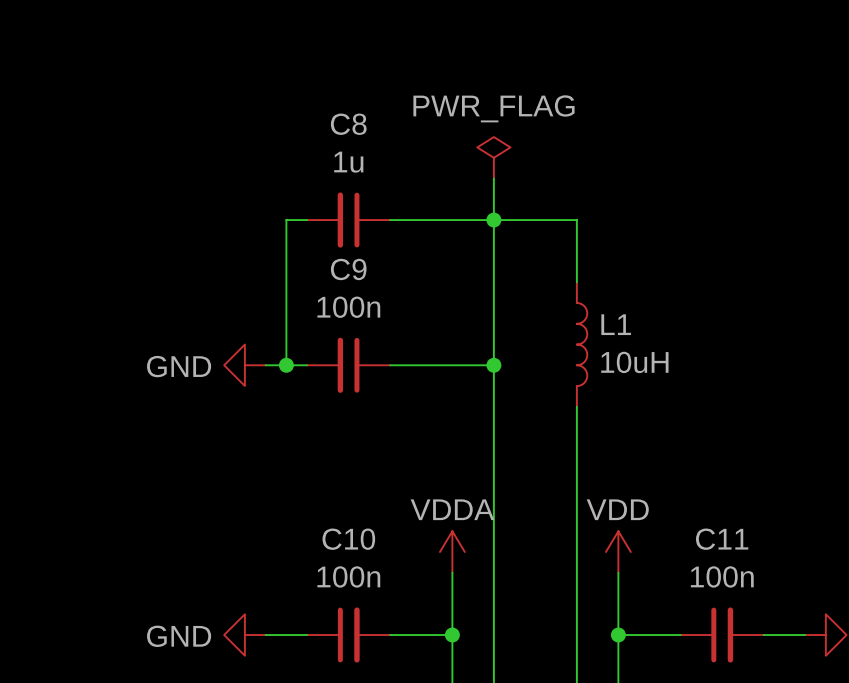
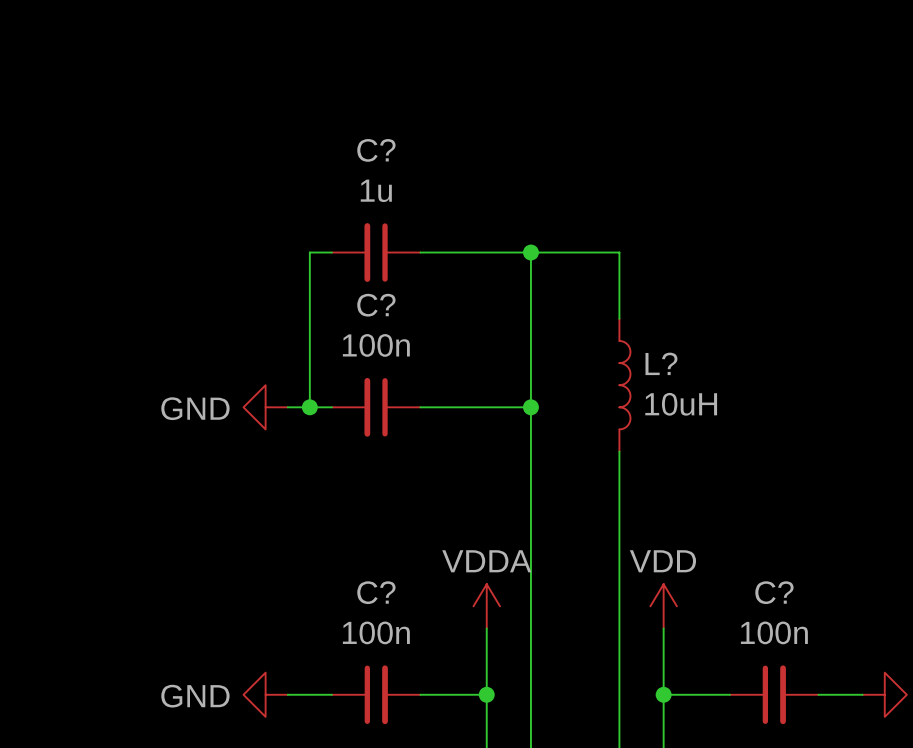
C8 name: C8 (348, 124) -> C? (376, 150)
power symbol: PWR_FLAG (493, 157) -> none
wire: (493, 178) (493, 220) -> none
C9 name: C9 (348, 269) -> C? (376, 305)
L1 name: L1 (616, 324) -> L? (661, 363)
C10 name: C10 (348, 539) -> C? (376, 592)
C11 name: C11 (722, 539) -> C? (774, 592)

